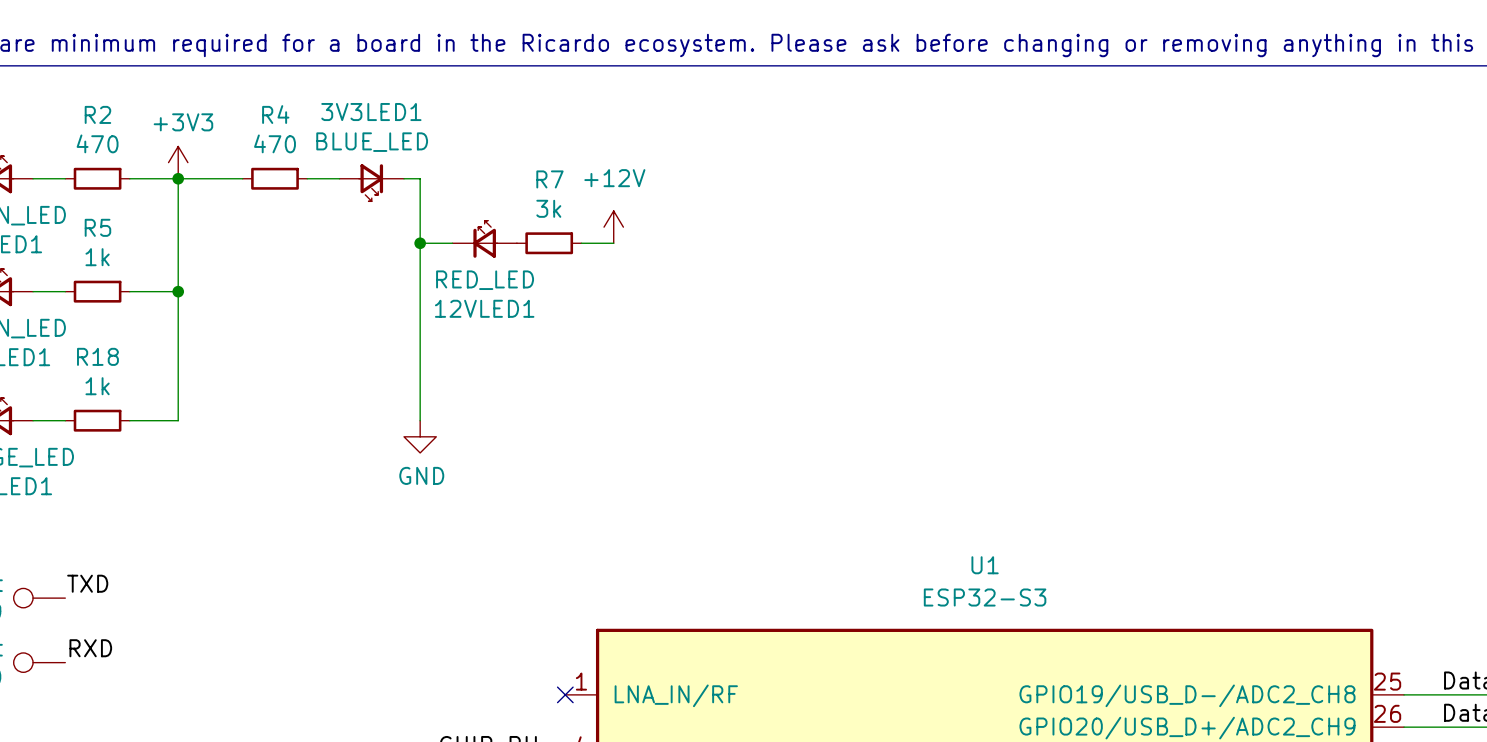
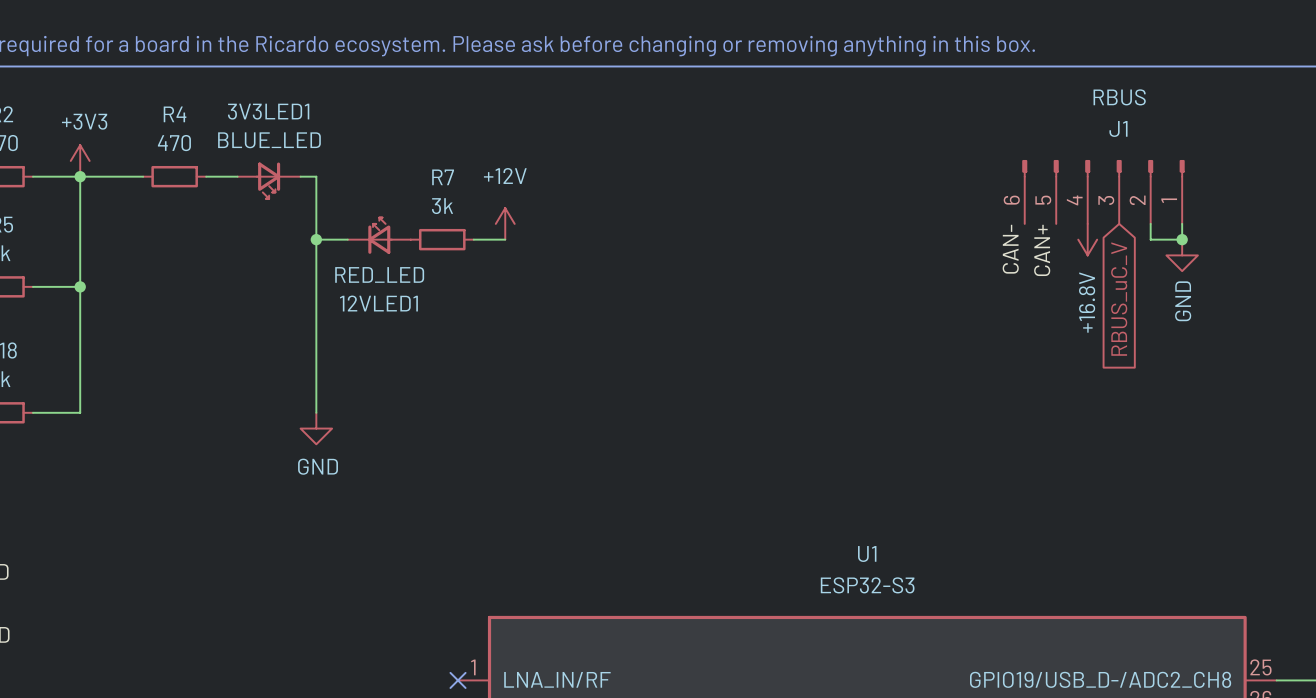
J1: none -> RBUS (1103, 191)
wire: none -> (1150, 223) (1150, 239) (1182, 239) (1182, 223)
power symbol: none -> +16.8V (1087, 239)
junction: none -> (1182, 239)
power symbol: none -> GND (1182, 255)
label: none -> CAN- (1010, 249)
label: none -> CAN+ (1042, 250)
global label: none -> RBUS_uC_V (1119, 299)

